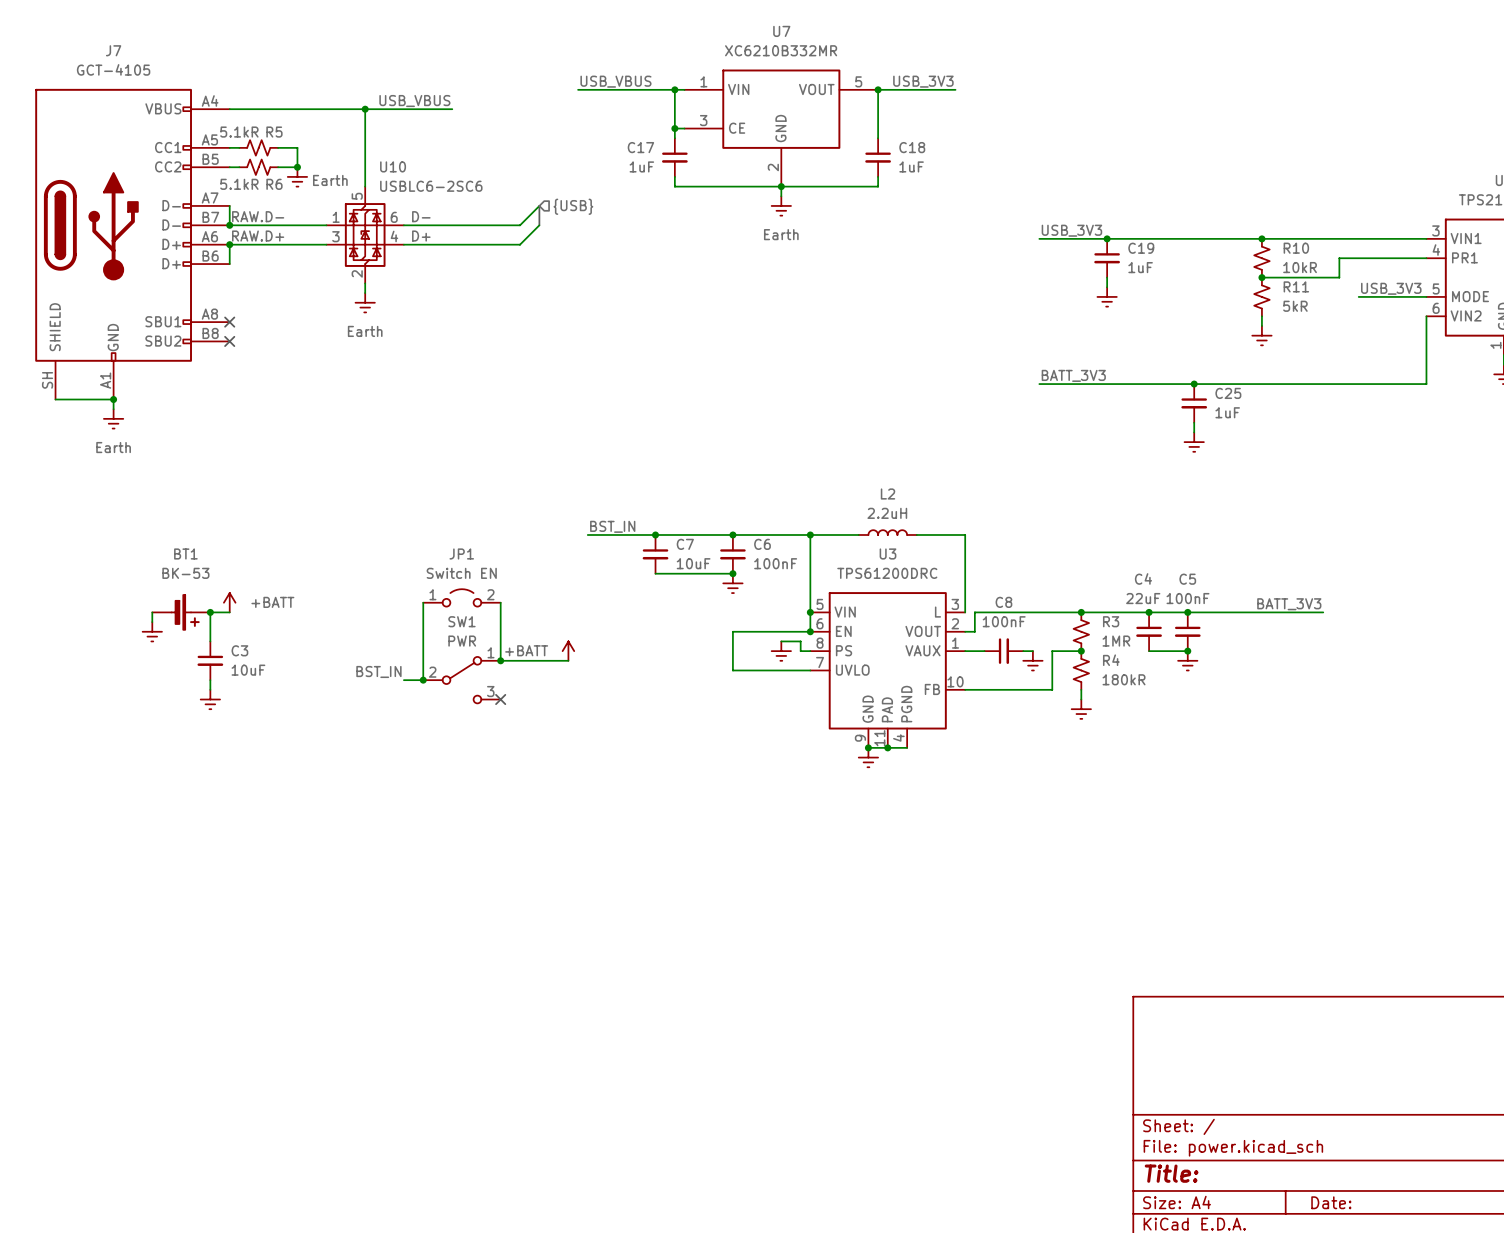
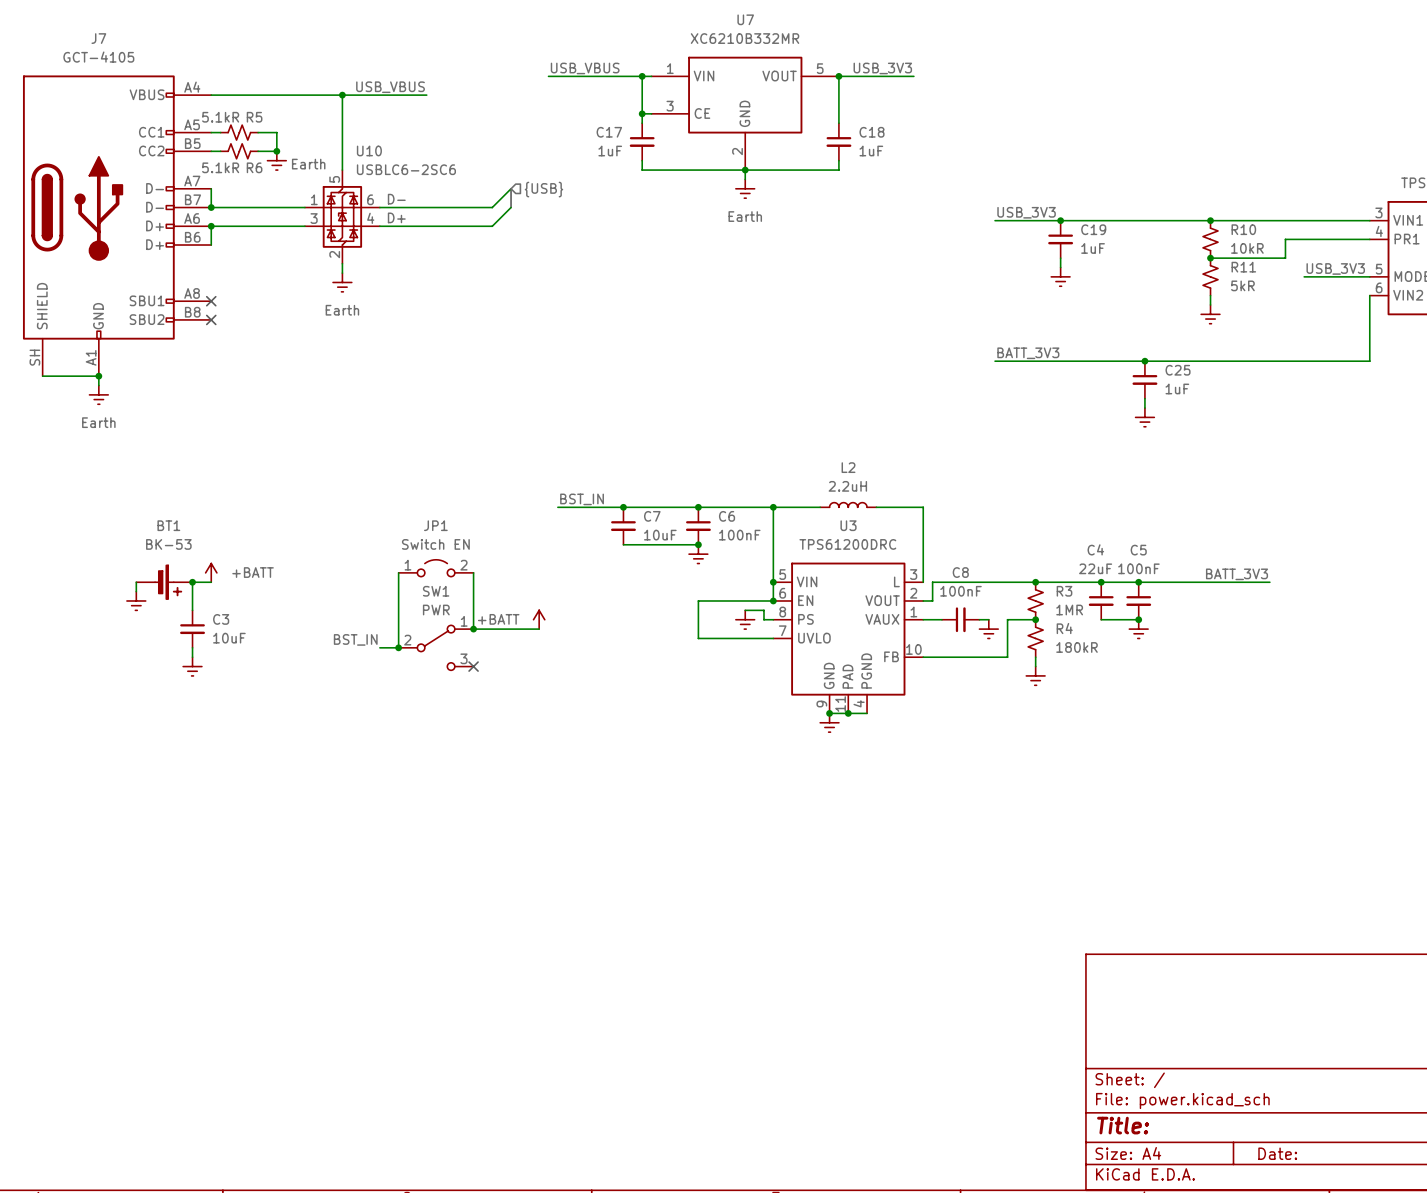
label: RAW.D- (258, 216) -> none
label: RAW.D+ (258, 236) -> none

